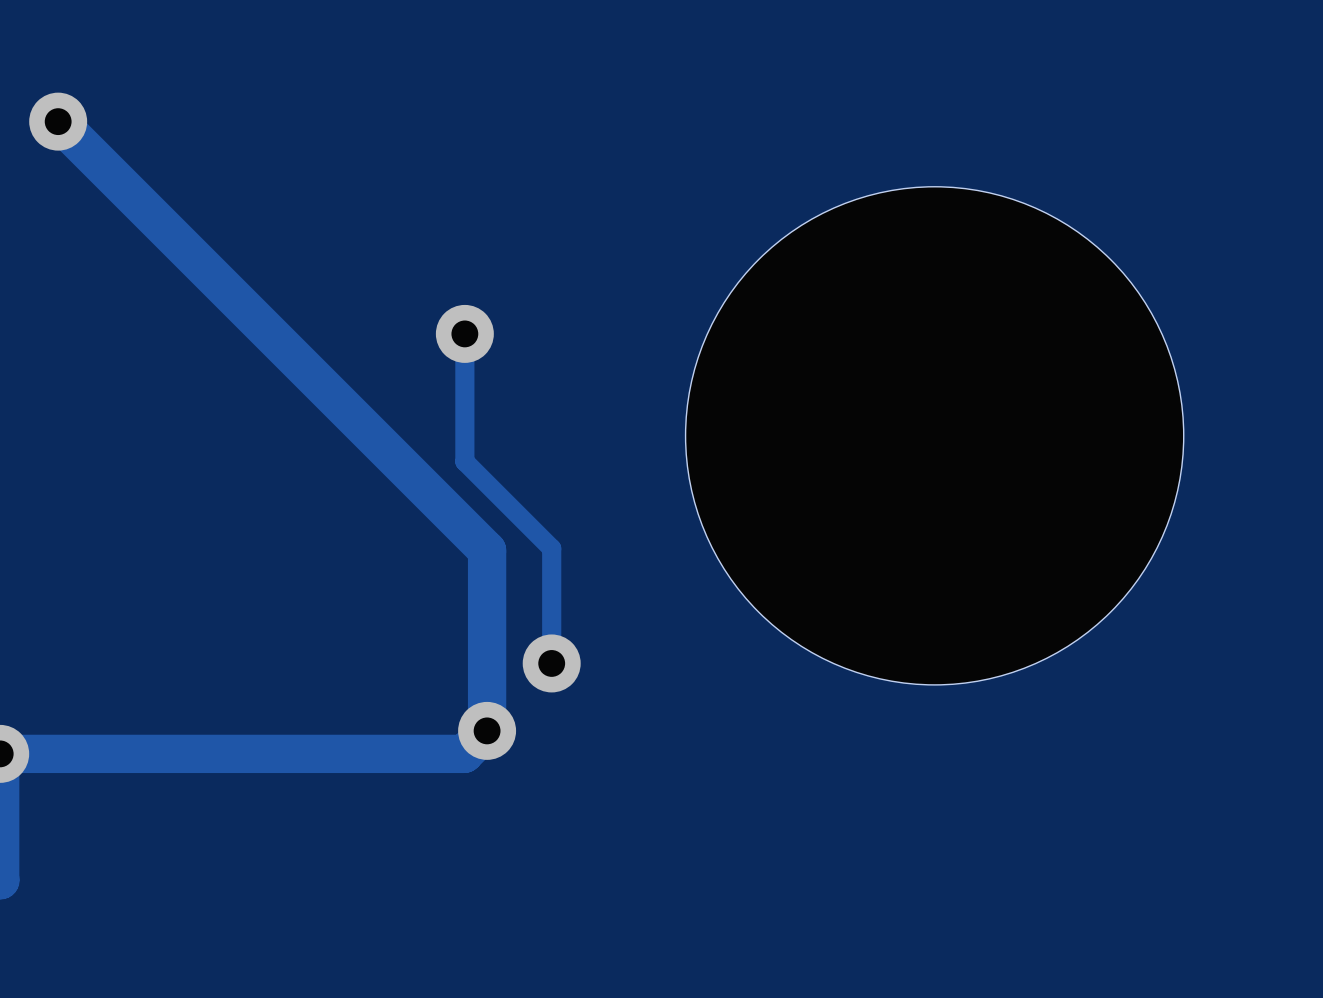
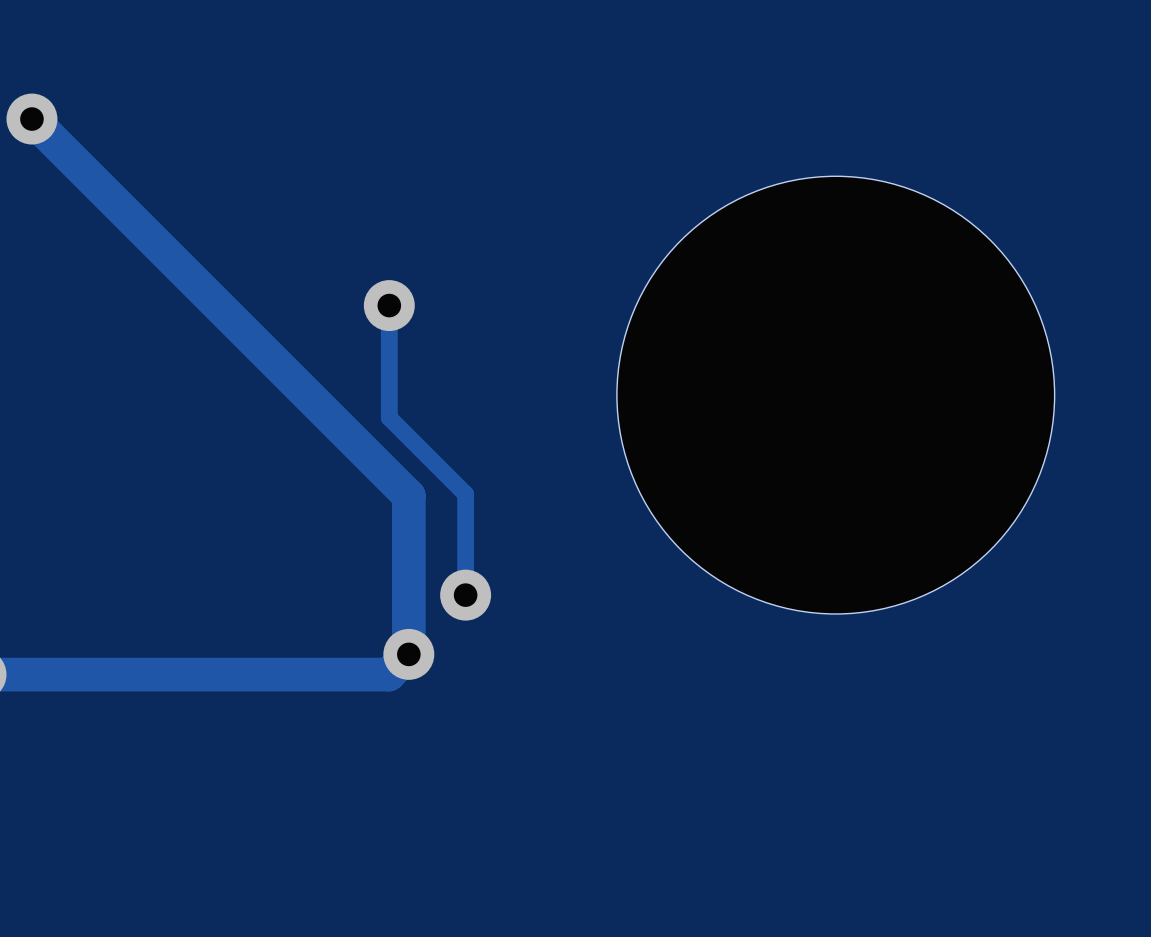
hole position: (934, 435) -> (835, 395)

